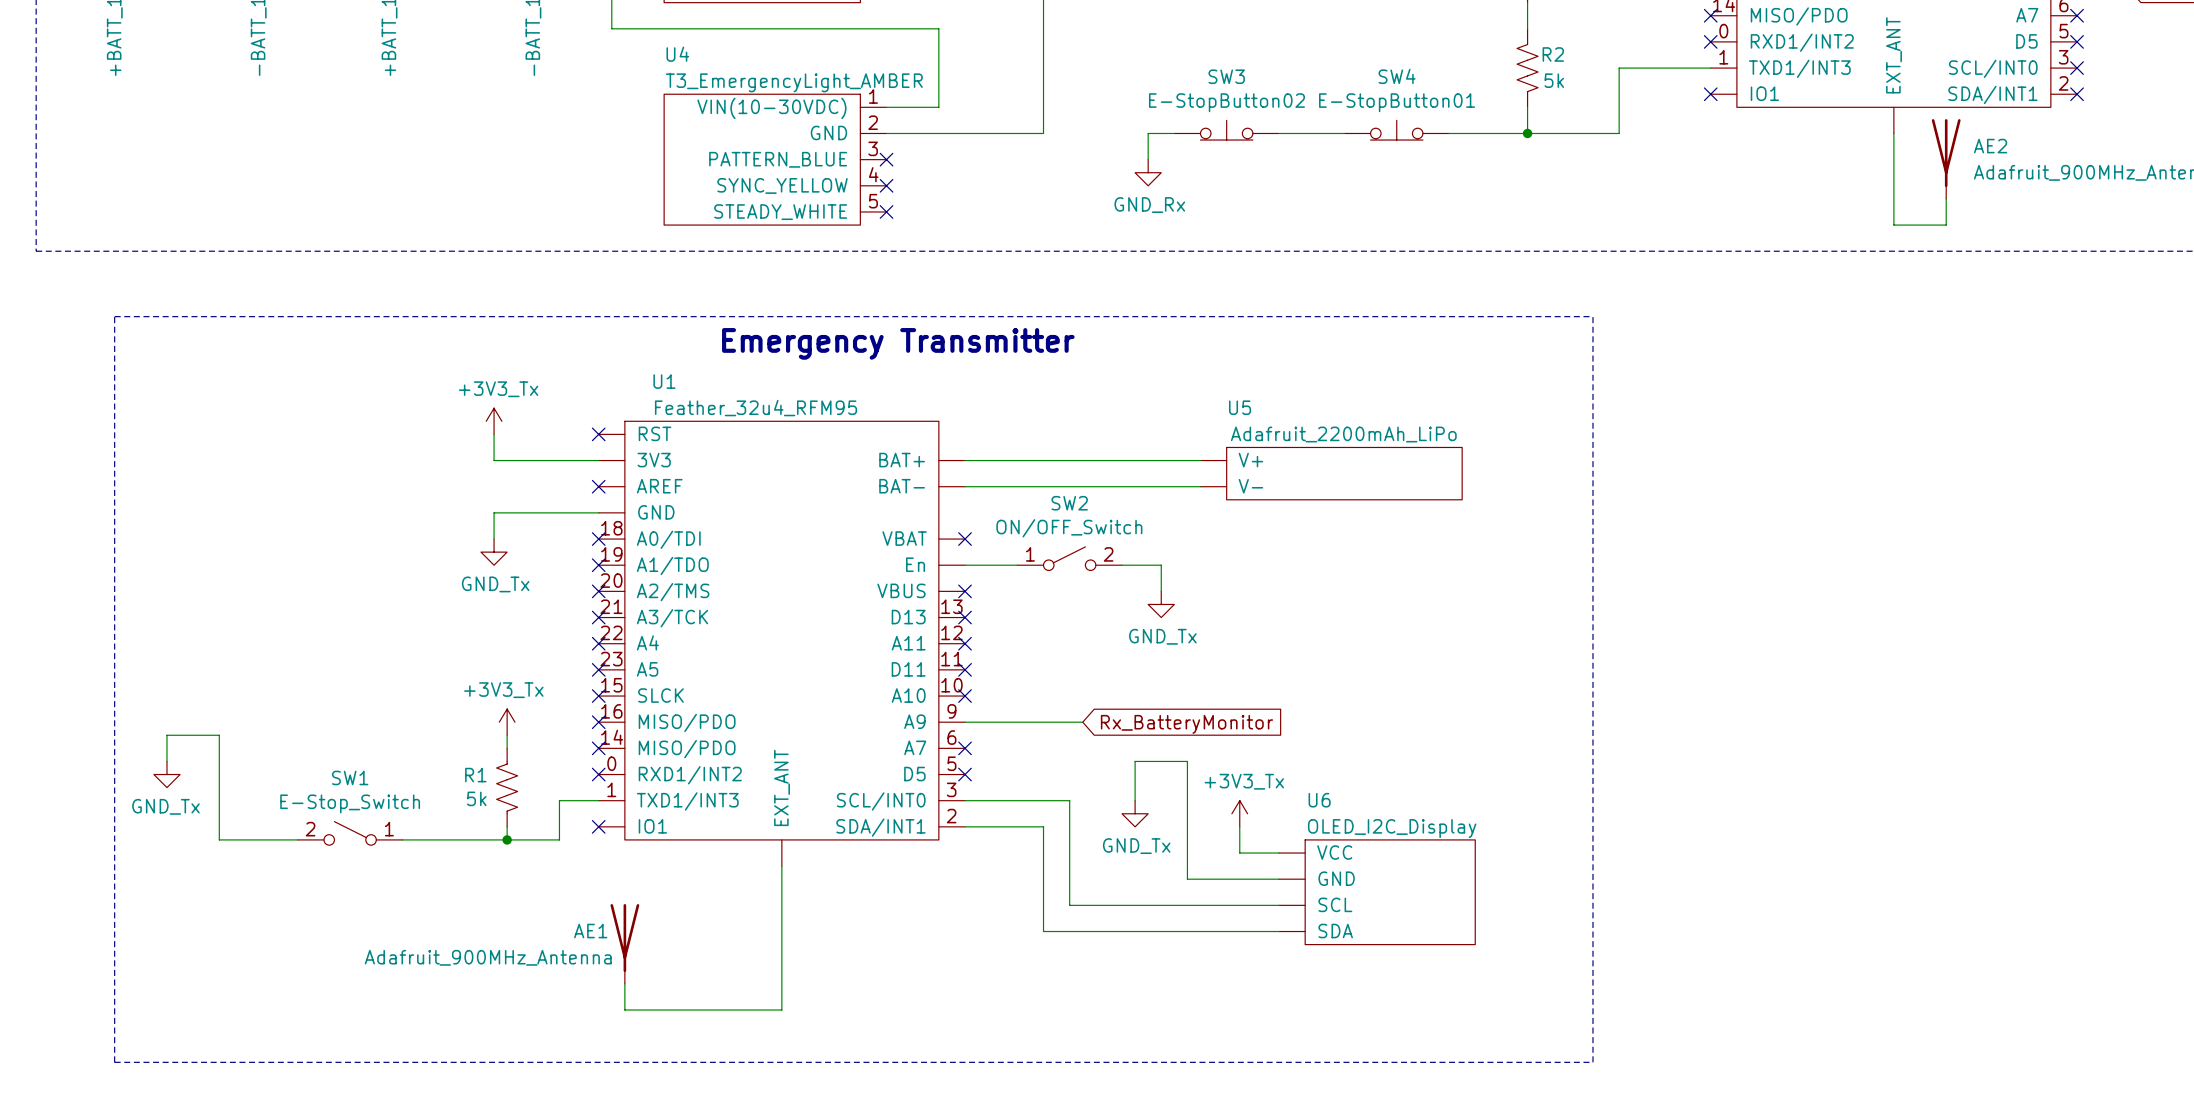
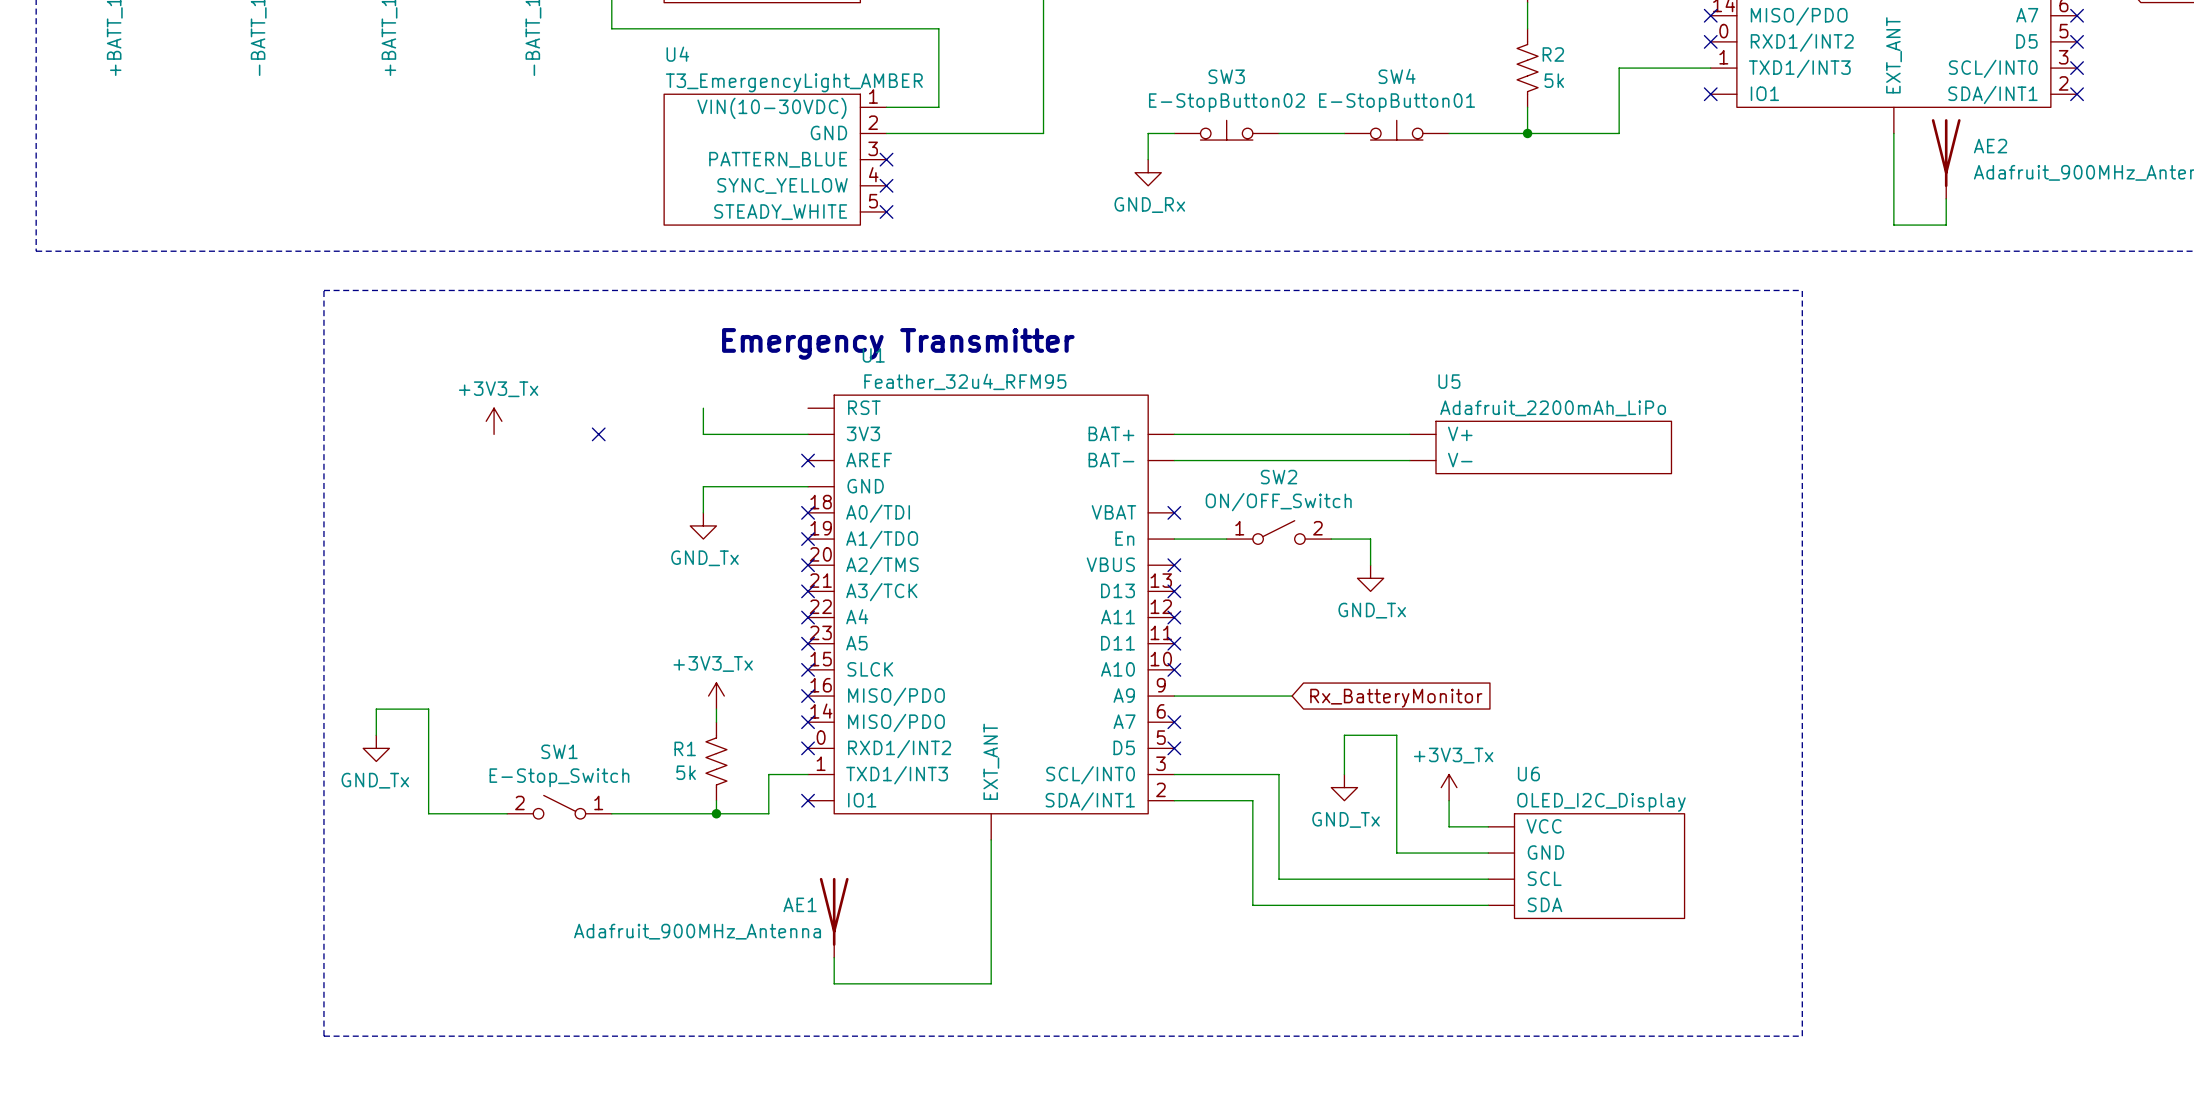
line: (114, 316) (114, 1062) (1592, 1062) (1592, 316) (114, 316) -> (323, 290) (323, 1036) (1802, 1036) (1802, 290) (323, 290)
wire: (494, 434) (494, 460) (598, 460) -> (703, 408) (703, 434) (808, 434)
no-connect mark: none -> (808, 460)
wire: (965, 460) (1174, 460) -> (1200, 460) (1409, 460)
U5 position: (1331, 473) -> (1540, 447)
no-connect mark: (598, 486) -> none
wire: (965, 486) (1200, 486) -> (1174, 434) (1409, 434)
wire: (598, 512) (494, 512) (494, 539) -> (808, 486) (703, 486) (703, 512)
no-connect mark: none -> (808, 512)
no-connect mark: none -> (1174, 512)
power symbol: none -> GND_Tx (703, 525)
no-connect mark: (598, 539) -> none
no-connect mark: none -> (808, 539)
no-connect mark: (965, 539) -> none
power symbol: GND_Tx (494, 552) -> none
SW2 position: (1069, 558) -> (1279, 532)
no-connect mark: (598, 565) -> none
no-connect mark: none -> (808, 565)
wire: (965, 565) (1017, 565) -> (1174, 539) (1226, 539)
wire: (1122, 565) (1161, 565) (1161, 591) -> (1331, 539) (1370, 539) (1370, 565)
no-connect mark: none -> (1174, 565)
power symbol: none -> GND_Tx (1370, 578)
no-connect mark: (598, 591) -> none
no-connect mark: none -> (808, 591)
no-connect mark: (965, 591) -> none
no-connect mark: none -> (1174, 591)
power symbol: GND_Tx (1161, 604) -> none
no-connect mark: (598, 617) -> none
no-connect mark: none -> (808, 617)
no-connect mark: (965, 617) -> none
no-connect mark: none -> (1174, 617)
no-connect mark: (598, 643) -> none
U1 position: (781, 643) -> (991, 617)
no-connect mark: none -> (808, 643)
no-connect mark: (965, 643) -> none
no-connect mark: none -> (1174, 643)
no-connect mark: (598, 669) -> none
no-connect mark: none -> (808, 669)
no-connect mark: (965, 669) -> none
no-connect mark: none -> (1174, 669)
no-connect mark: (598, 696) -> none
no-connect mark: none -> (808, 696)
no-connect mark: (965, 696) -> none
power symbol position: +3V3_Tx (507, 722) -> +3V3_Tx (716, 696)
no-connect mark: (598, 722) -> none
no-connect mark: none -> (808, 722)
wire: (965, 722) (1082, 722) -> (1174, 696) (1292, 696)
no-connect mark: none -> (1174, 722)
global label position: Rx_BatteryMonitor (1186, 724) -> Rx_BatteryMonitor (1396, 698)
wire: (507, 735) (507, 748) -> (716, 709) (716, 722)
power symbol: none -> GND_Tx (376, 748)
no-connect mark: (598, 748) -> none
no-connect mark: none -> (808, 748)
no-connect mark: (965, 748) -> none
no-connect mark: none -> (1174, 748)
wire: (166, 761) (166, 735) (219, 735) (219, 839) (297, 839) -> (376, 735) (376, 709) (428, 709) (428, 813) (507, 813)
power symbol: GND_Tx (166, 774) -> none
no-connect mark: (598, 774) -> none
no-connect mark: (965, 774) -> none
wire: none -> (1174, 774) (1279, 774) (1279, 879) (1488, 879)
R1 position: (507, 787) -> (716, 761)
power symbol: none -> GND_Tx (1344, 787)
wire: (598, 800) (559, 800) (559, 839) (402, 839) -> (808, 774) (768, 774) (768, 813) (611, 813)
no-connect mark: none -> (808, 800)
wire: (965, 800) (1069, 800) (1069, 905) (1252, 905) -> (1174, 800) (1252, 800) (1252, 905)
wire: (1135, 800) (1135, 761) (1187, 761) (1187, 879) (1279, 879) -> (1344, 774) (1344, 735) (1396, 735) (1396, 853) (1488, 853)
junction: none -> (716, 813)
power symbol: GND_Tx (1135, 813) -> none
power symbol position: +3V3_Tx (1239, 813) -> +3V3_Tx (1449, 787)
wire: (507, 826) (507, 839) -> (716, 800) (716, 813)
no-connect mark: (598, 826) -> none
wire: (965, 826) (1043, 826) (1043, 931) (1279, 931) -> none
wire: (1239, 826) (1239, 853) (1279, 853) -> (1449, 800) (1449, 826) (1488, 826)
SW1 position: (350, 833) -> (559, 807)
junction: (507, 839) -> none
wire: (781, 866) (781, 1010) (624, 1010) (624, 983) -> (991, 839) (991, 983) (834, 983) (834, 957)
U6 position: (1377, 892) -> (1586, 866)
wire: none -> (1279, 905) (1488, 905)
AE1 position: (624, 943) -> (834, 917)

